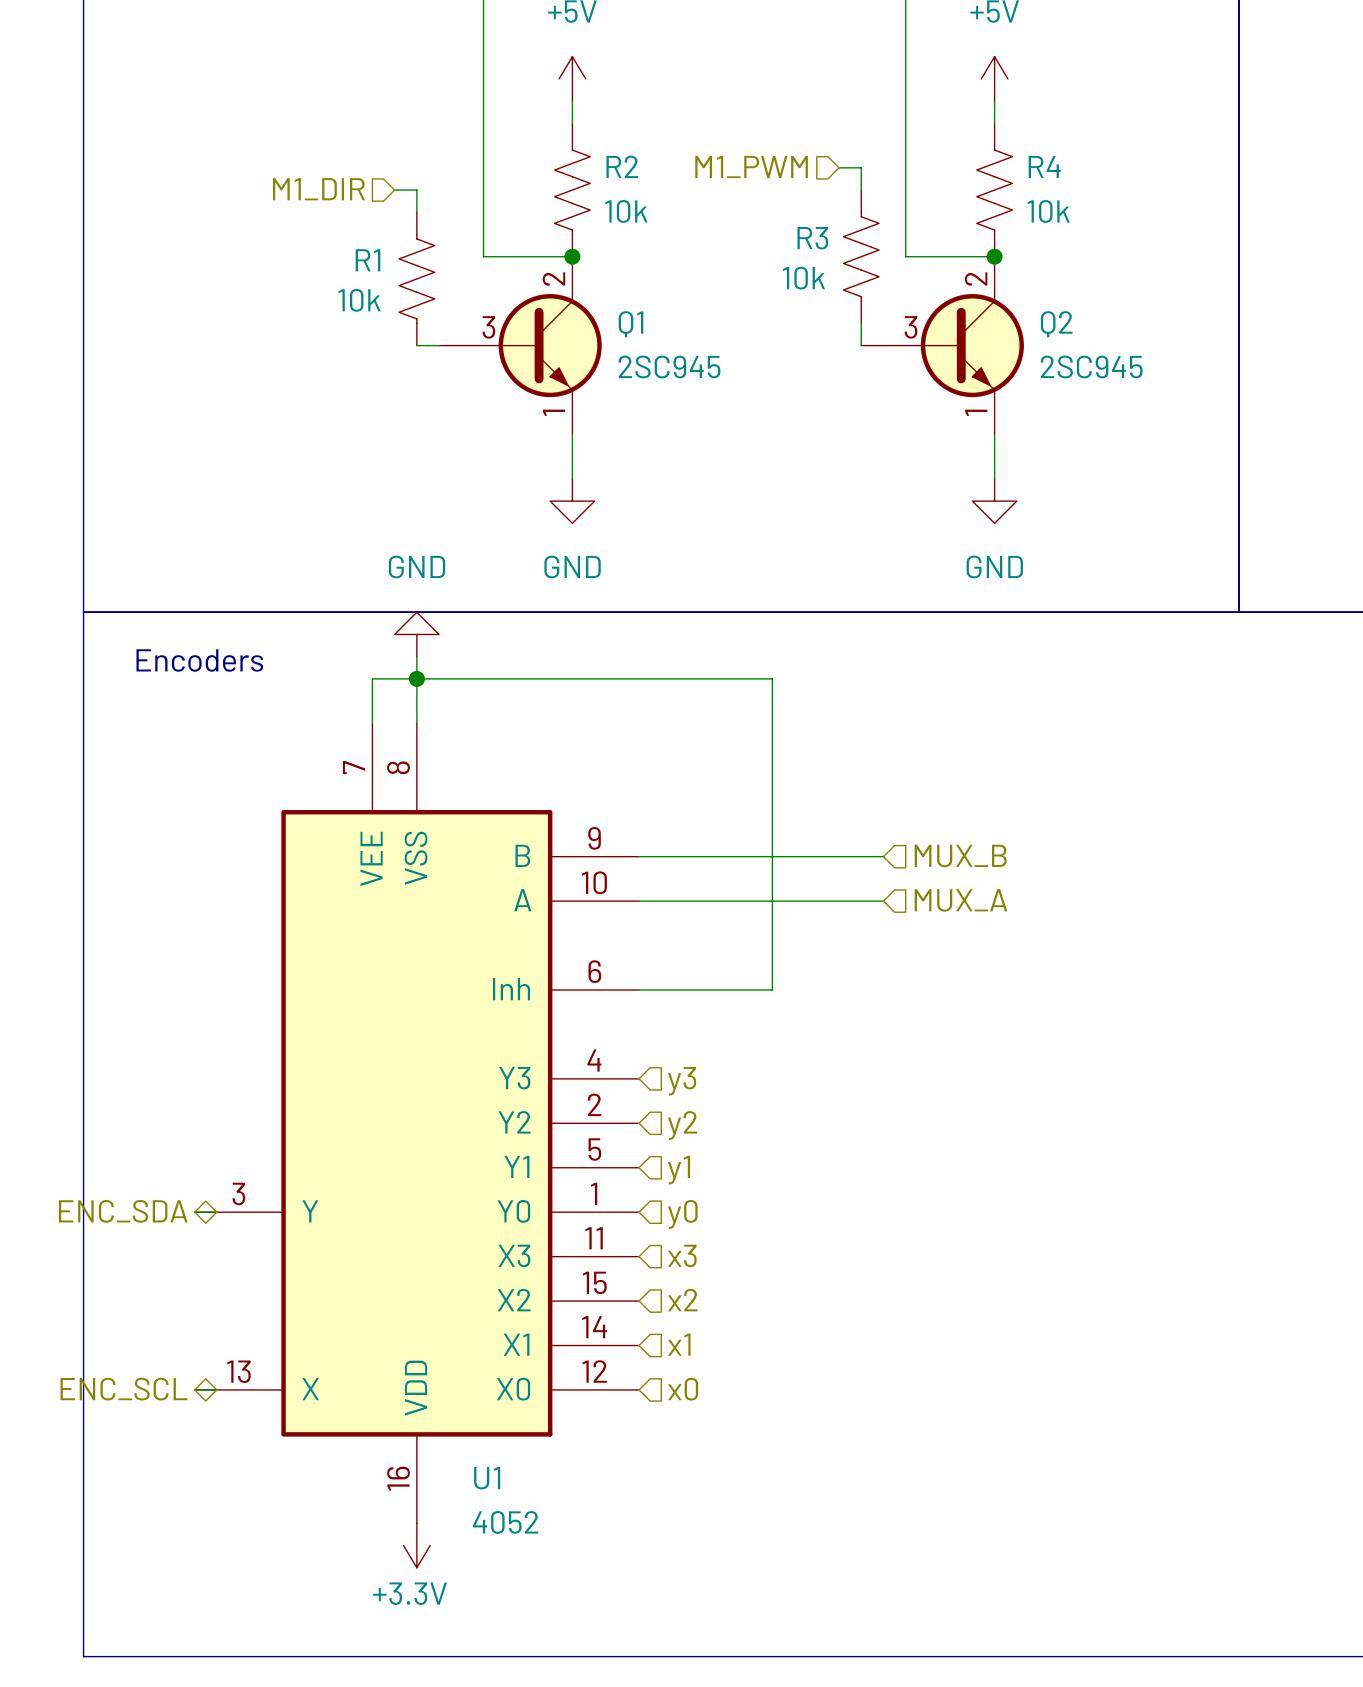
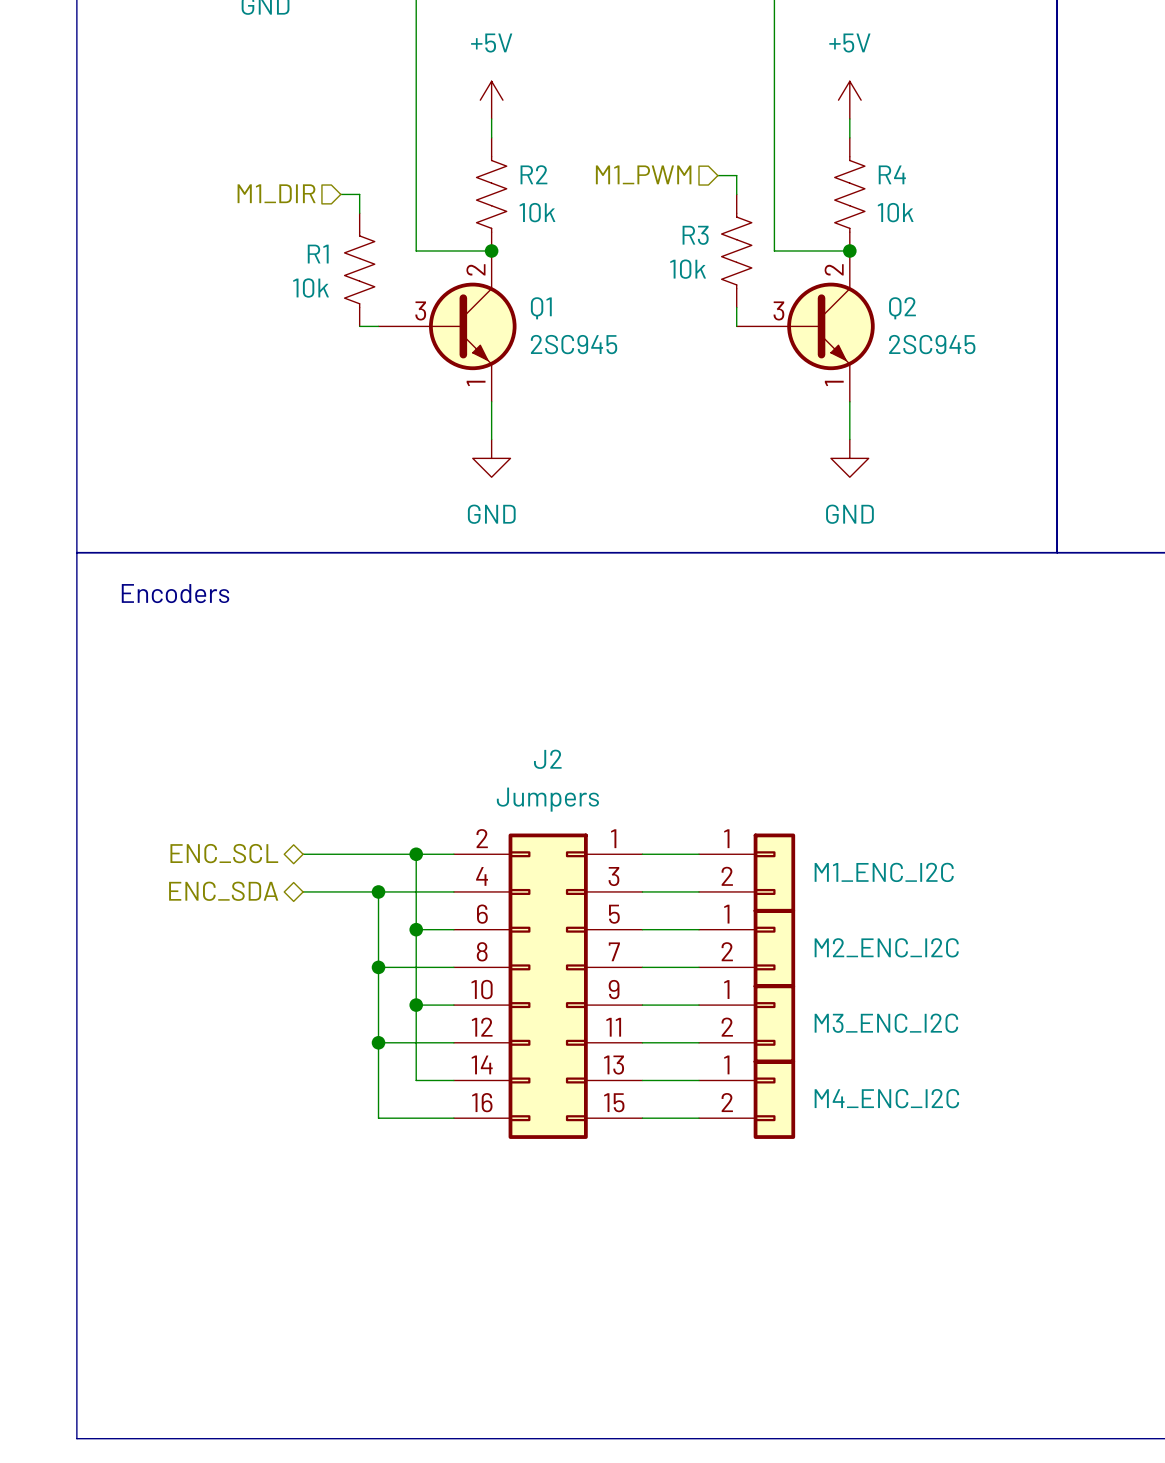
power symbol: GND (416, 634) -> none
wire: (416, 656) (416, 723) -> none
junction: (416, 678) -> none
wire: (372, 723) (372, 678) (772, 678) (772, 989) (639, 989) -> none
hierarchical label: MUX_B (960, 855) -> none
wire: (639, 856) (883, 856) -> none
hierarchical label: MUX_A (960, 900) -> none
wire: (639, 901) (883, 901) -> none
hierarchical label: none -> ENC_SCL (224, 853)
junction: none -> (416, 854)
wire: none -> (642, 854) (699, 854)
part: none -> M1_ENC_I2C (747, 873)
junction: none -> (378, 891)
wire: none -> (642, 891) (699, 891)
junction: none -> (416, 929)
wire: none -> (642, 929) (699, 929)
part: none -> M2_ENC_I2C (747, 948)
hierarchical label: y3 (682, 1081) -> none
junction: none -> (378, 967)
wire: none -> (642, 967) (699, 967)
U1: 4052 (416, 1123) -> none
J2: none -> Jumpers (548, 986)
hierarchical label: y2 (682, 1125) -> none
junction: none -> (416, 1005)
wire: none -> (642, 1005) (699, 1005)
part: none -> M3_ENC_I2C (747, 1023)
hierarchical label: y1 (679, 1170) -> none
junction: none -> (378, 1042)
wire: none -> (642, 1042) (699, 1042)
hierarchical label position: ENC_SDA (123, 1211) -> ENC_SDA (223, 891)
wire: (194, 1212) (216, 1212) -> none
hierarchical label: y0 (682, 1214) -> none
wire: none -> (642, 1080) (699, 1080)
hierarchical label: x3 (682, 1255) -> none
part: none -> M4_ENC_I2C (747, 1099)
wire: none -> (642, 1118) (699, 1118)
hierarchical label: x2 (682, 1300) -> none
hierarchical label: x1 (679, 1344) -> none
hierarchical label: ENC_SCL (124, 1389) -> none
wire: (194, 1389) (216, 1389) -> none
hierarchical label: x0 (683, 1389) -> none
power symbol: +3.3V (416, 1545) -> none

